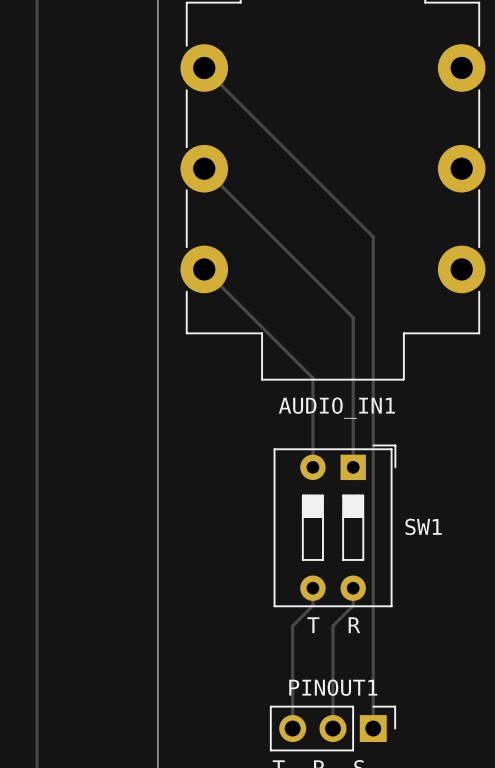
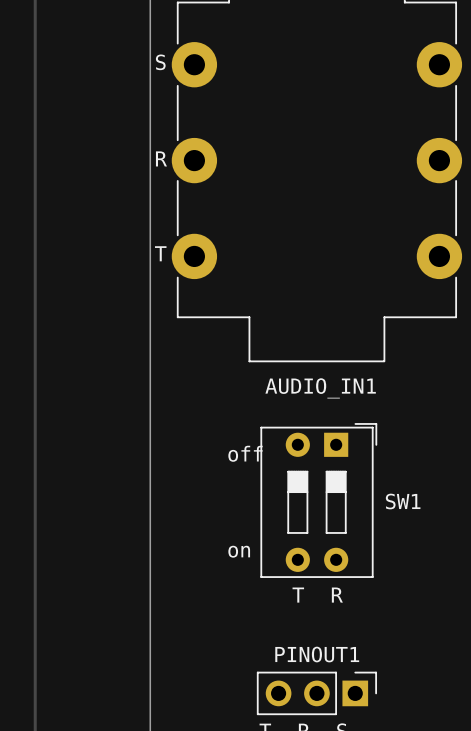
text: none -> S (160, 62)
track: (204, 67) (373, 236) (373, 728) -> none
text: none -> R (161, 158)
track: (204, 168) (353, 317) (353, 467) -> none
text: none -> T (160, 253)
track: (204, 269) (312, 378) (312, 467) -> none
text: none -> off (245, 453)
text: none -> on (239, 551)
track: (312, 588) (312, 605) (292, 625) (292, 728) -> none
track: (353, 588) (353, 605) (332, 625) (332, 728) -> none

